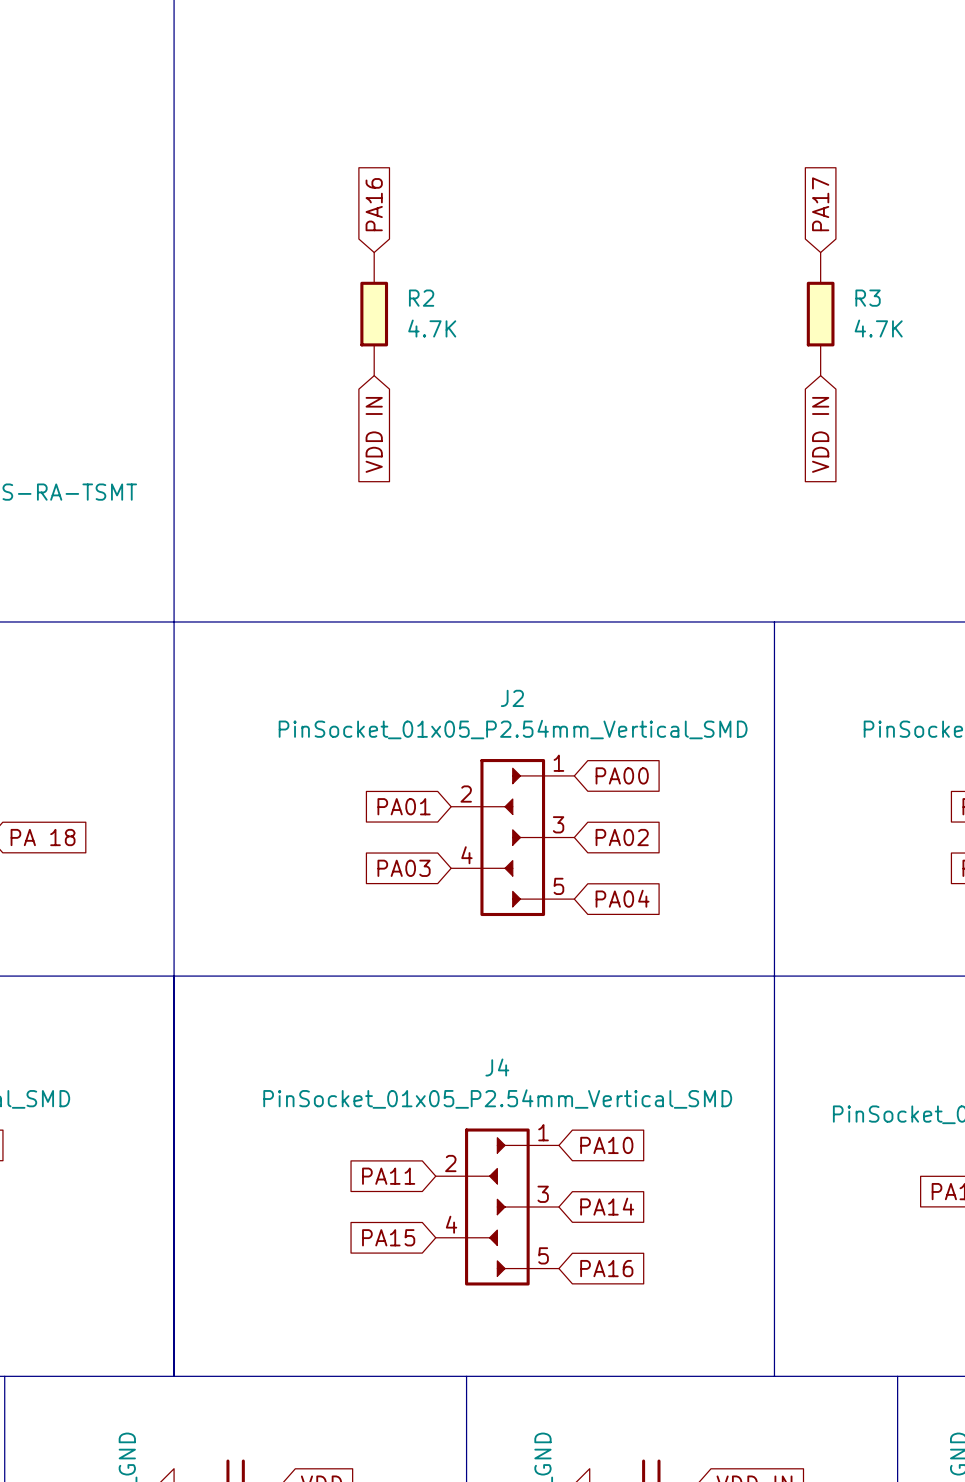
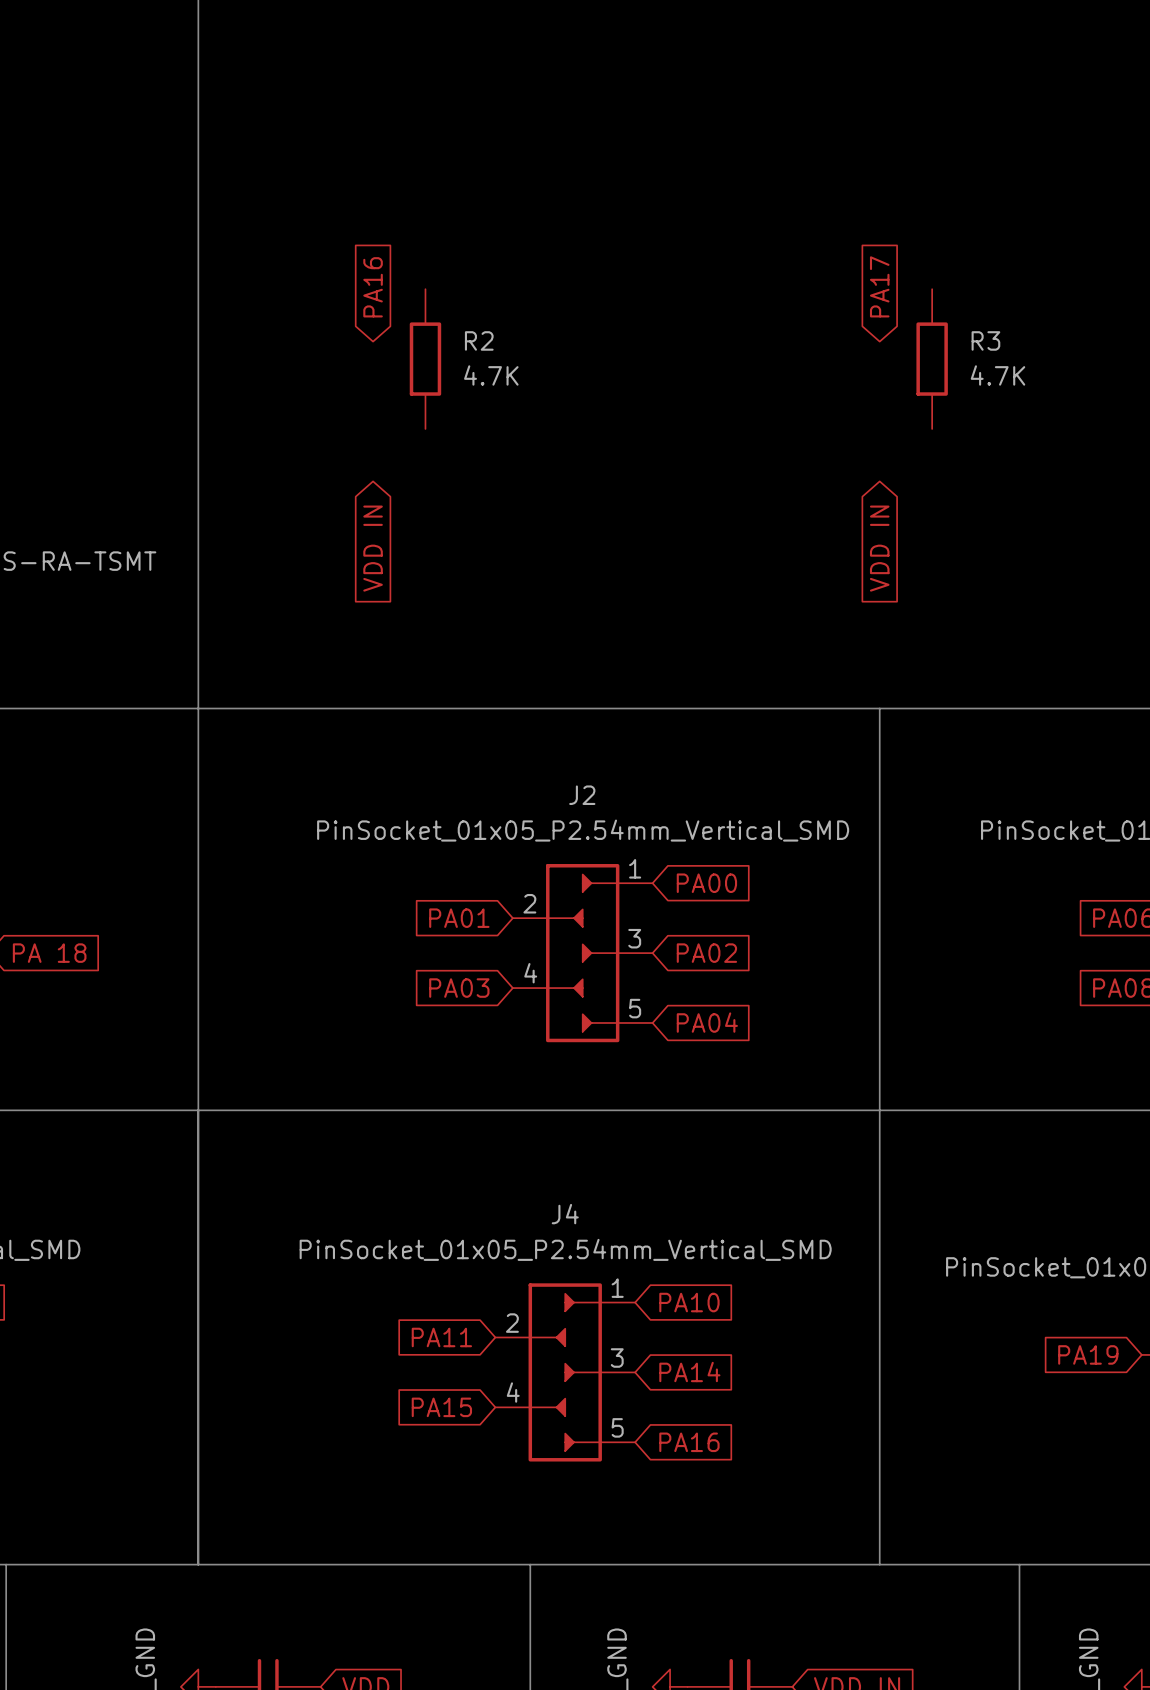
global label position: PA16 (374, 204) -> PA16 (373, 287)
global label position: PA17 (820, 204) -> PA17 (879, 286)
global label position: VDD IN (374, 434) -> VDD IN (373, 548)
global label position: VDD IN (820, 434) -> VDD IN (879, 548)

